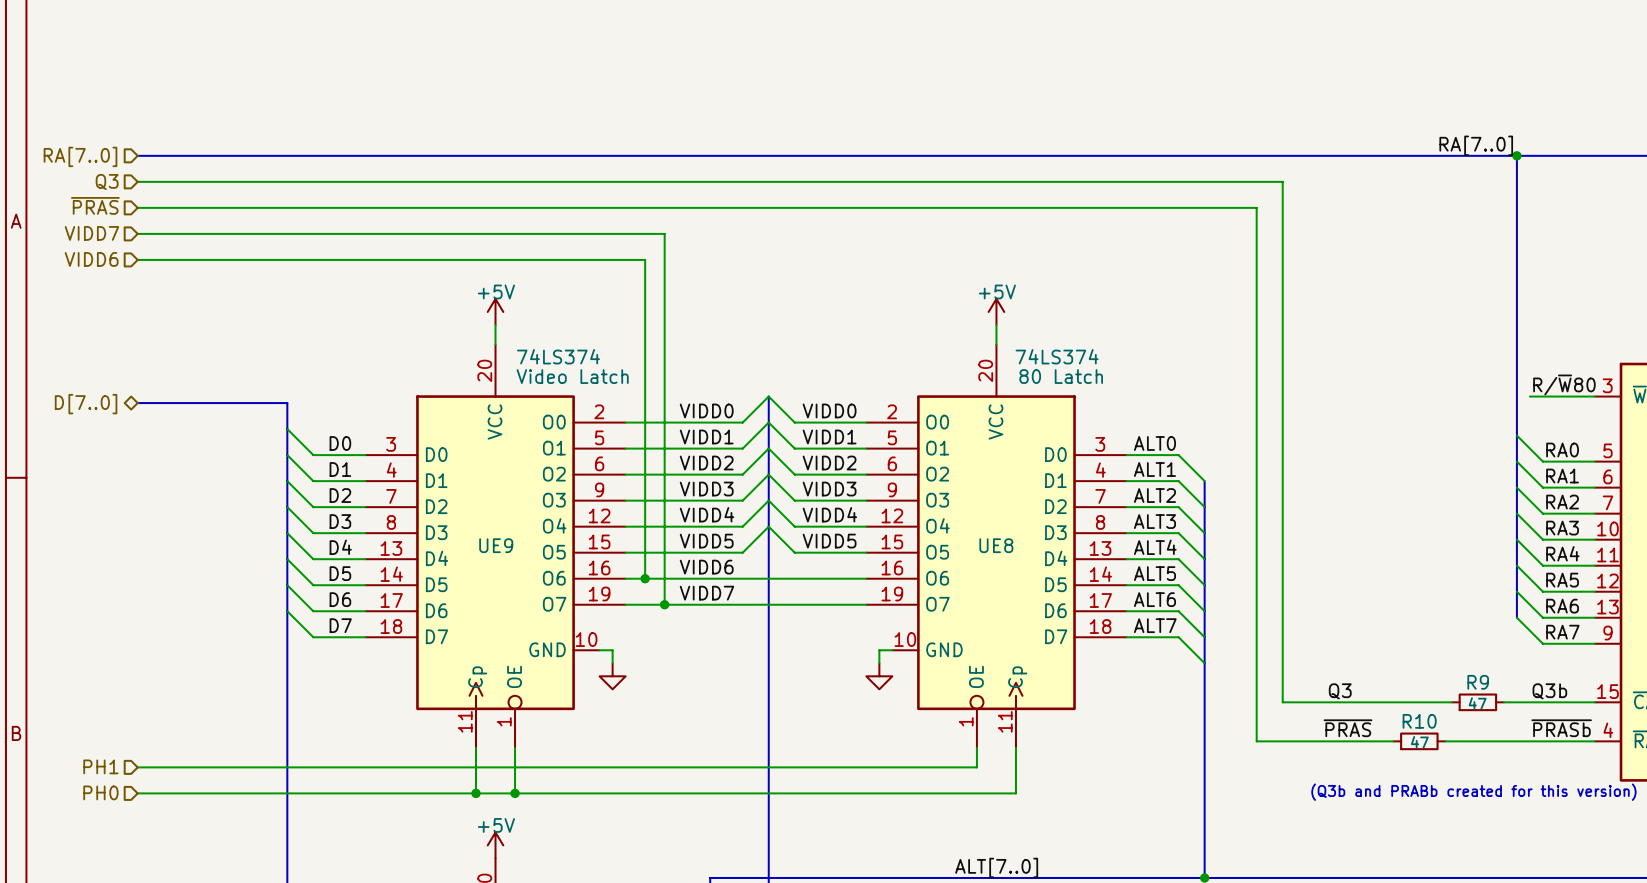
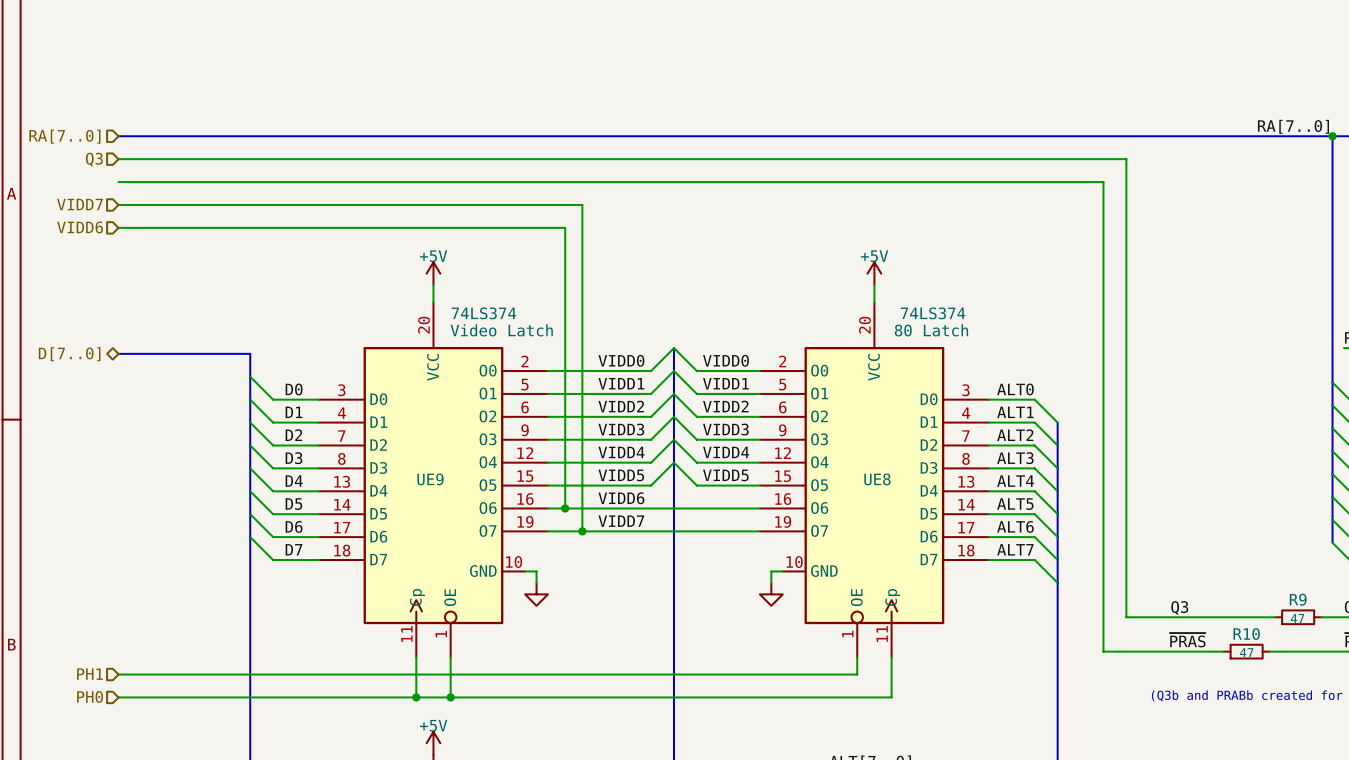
hierarchical label: ~{PRAS} (95, 205) -> none

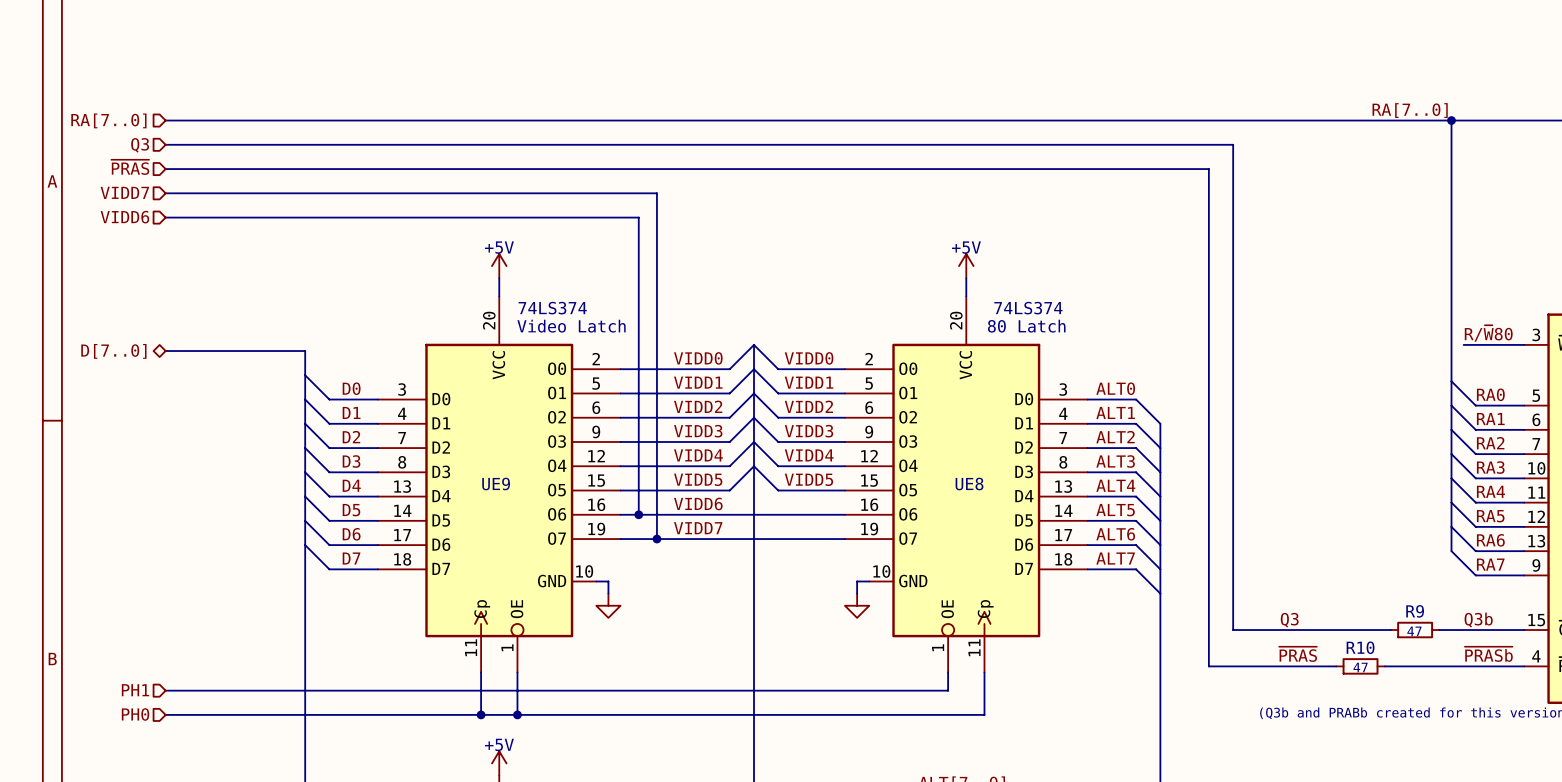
hierarchical label: none -> ~{PRAS} (130, 167)

